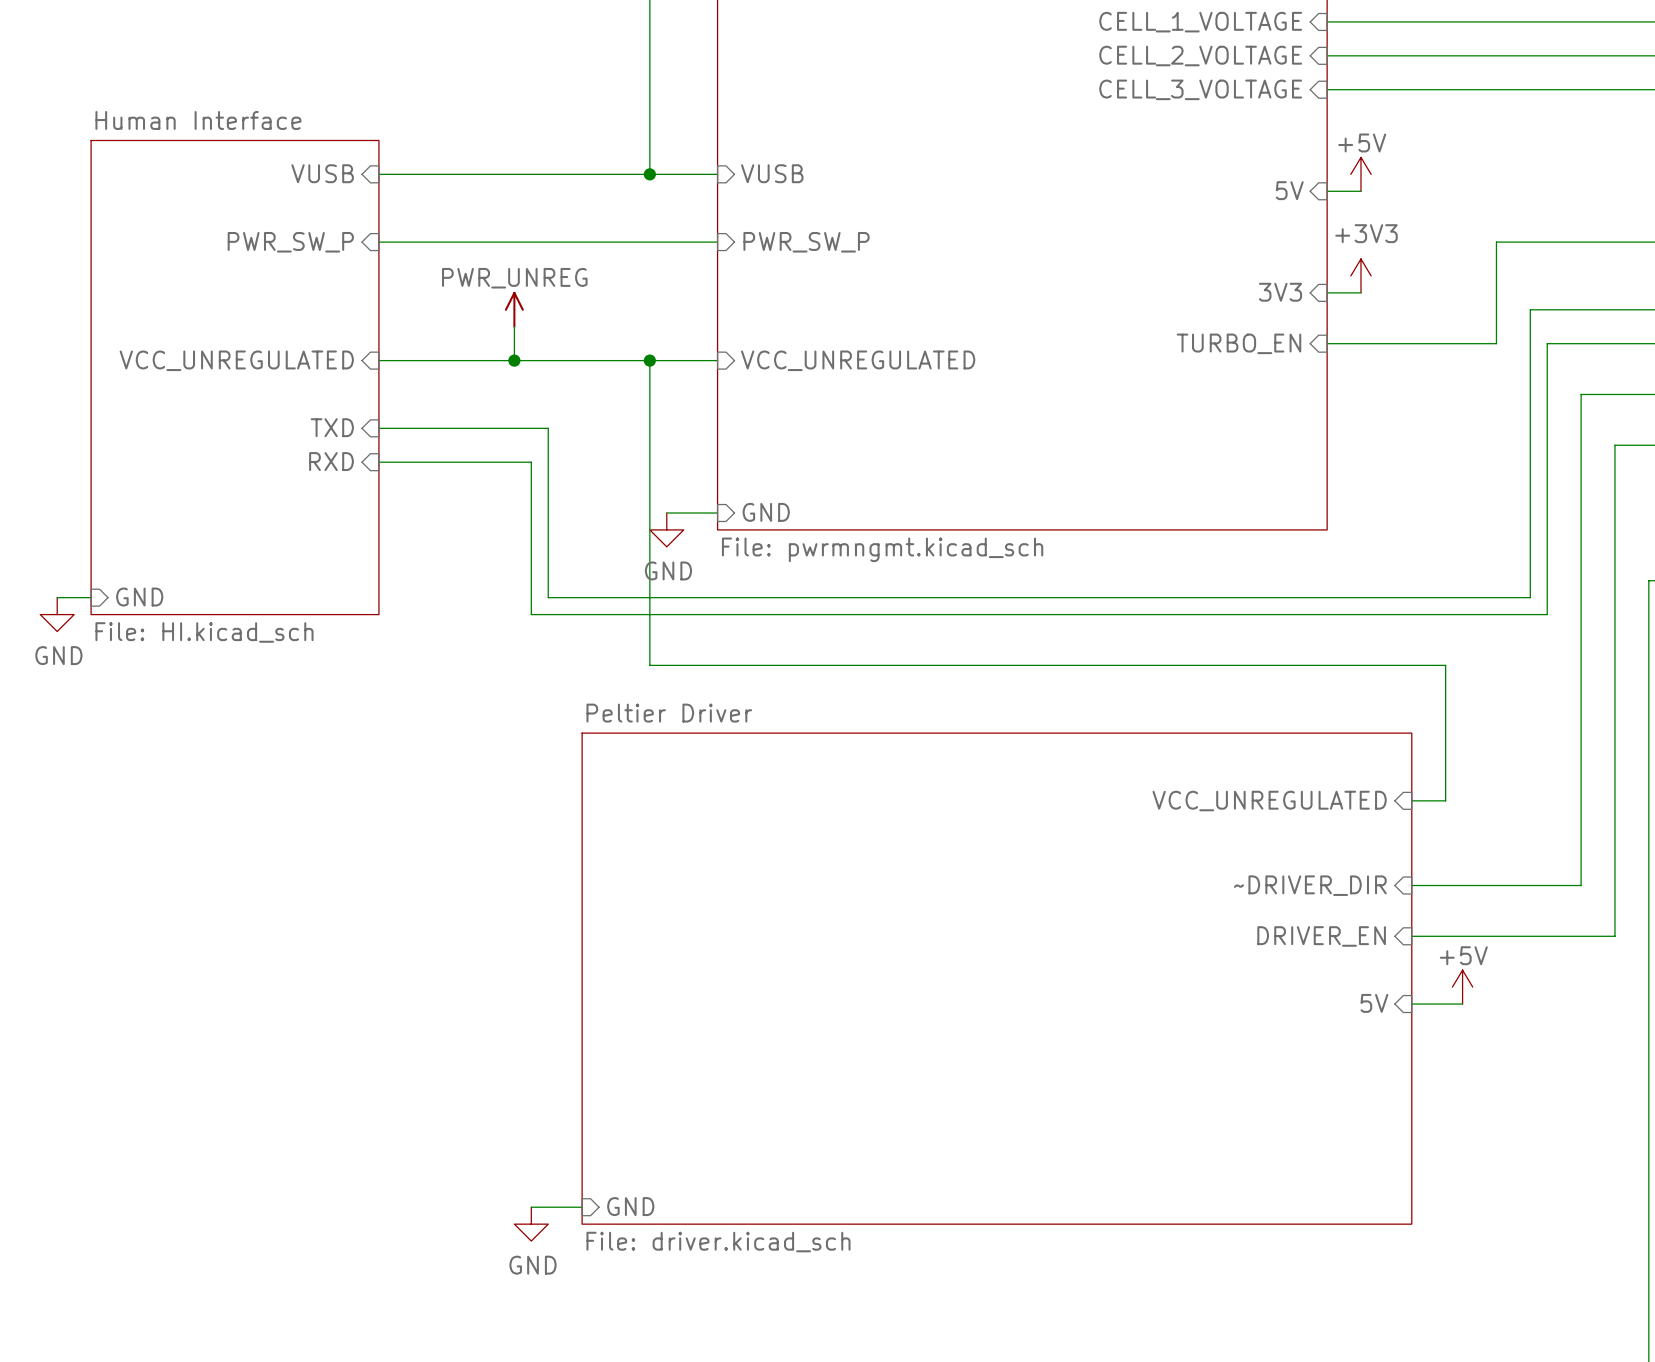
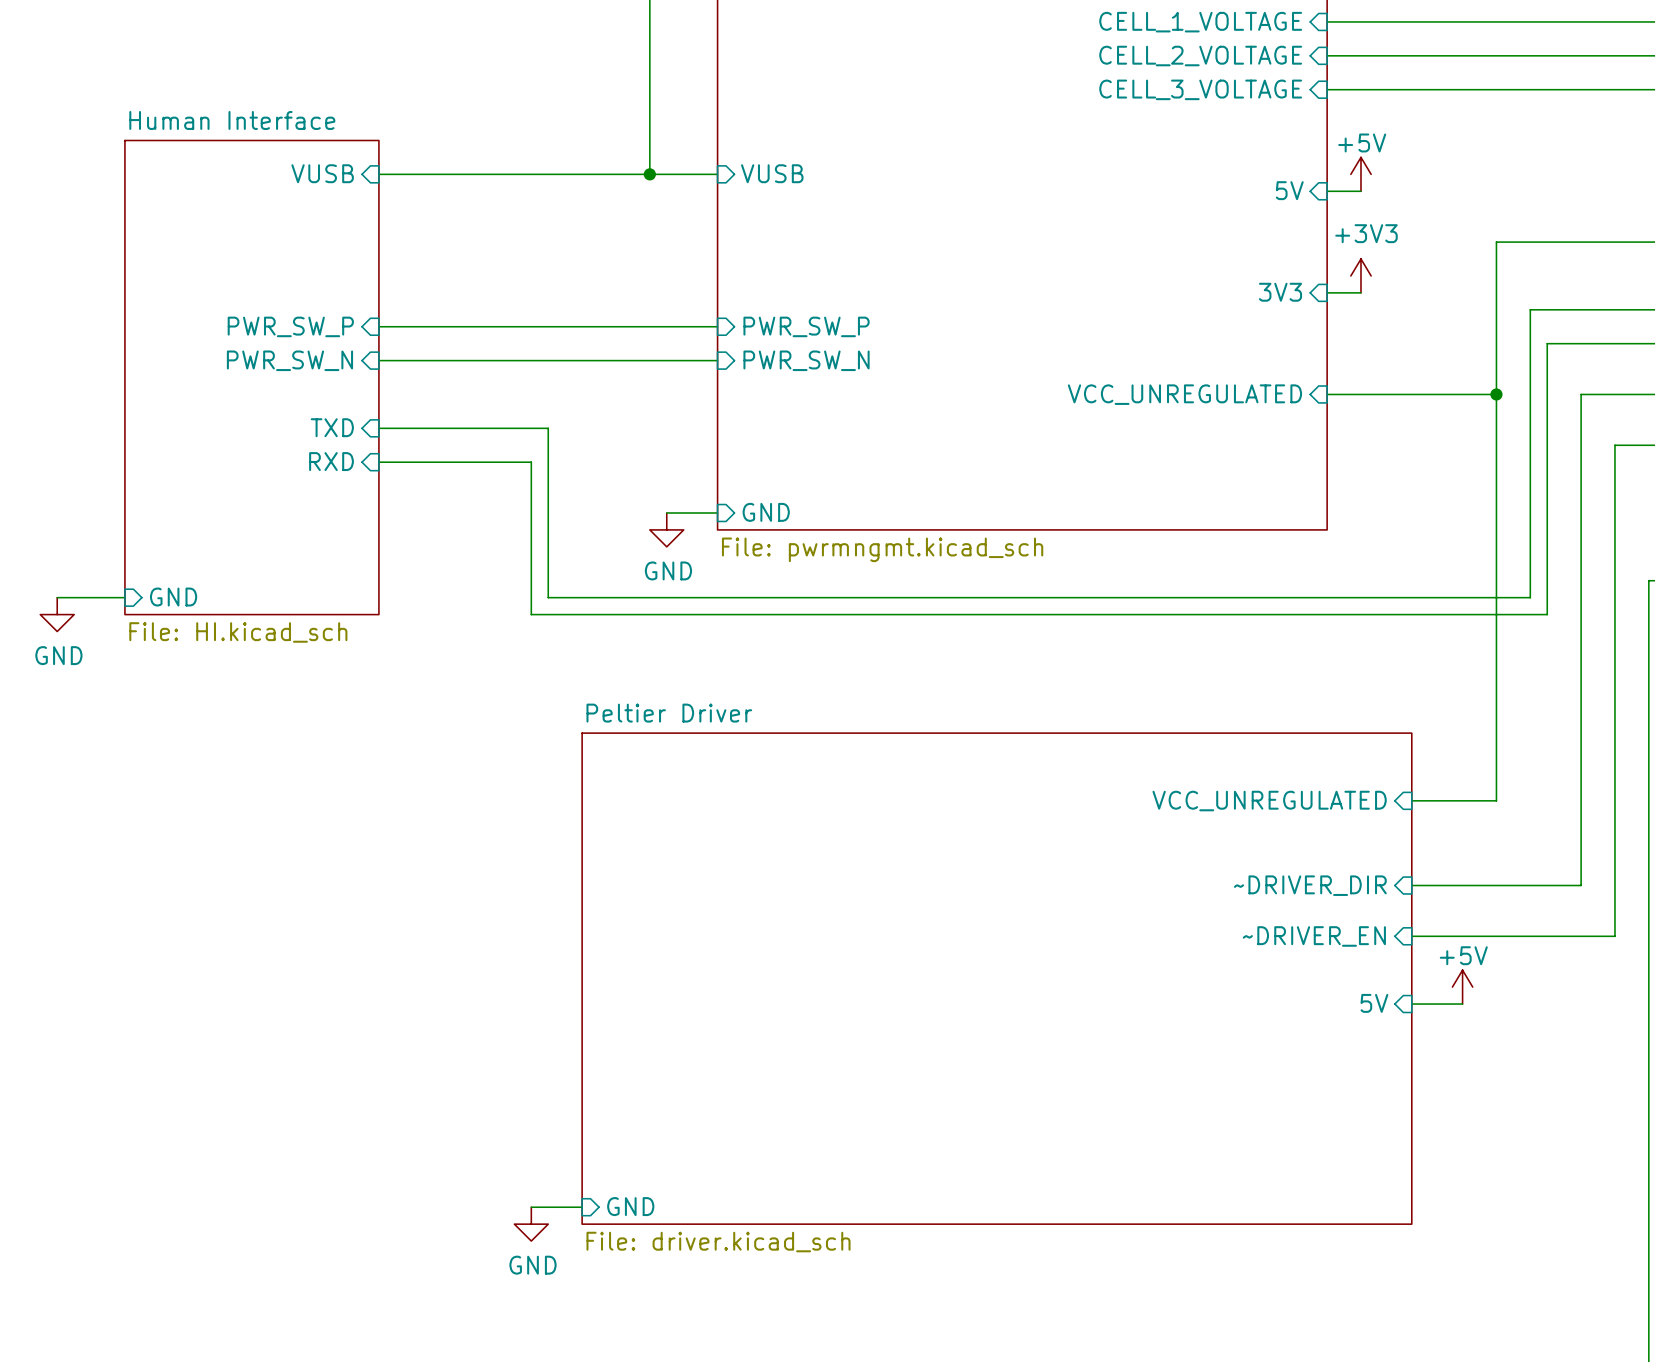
sheet pin position: PWR_SW_P (290, 242) -> PWR_SW_P (290, 326)
wire: (378, 242) (717, 242) -> (378, 326) (717, 326)
sheet pin position: PWR_SW_P (806, 242) -> PWR_SW_P (806, 326)
power symbol: PWR_UNREG (514, 309) -> none
wire: (514, 326) (514, 360) -> none
sheet pin: TURBO_EN (1238, 343) -> none
wire: (1327, 343) (1496, 343) -> (1445, 800) (1496, 800) (1496, 343)
sheet pin: VCC_UNREGULATED (236, 360) -> PWR_SW_N (289, 360)
junction: (514, 360) -> none
wire: (649, 360) (649, 665) (1445, 665) (1445, 800) -> none
junction: (649, 360) -> none
sheet pin: VCC_UNREGULATED (858, 360) -> PWR_SW_N (806, 360)
sheet Human Interface: File: HI.kicad_sch (235, 377) -> none
sheet Human Interface: none -> File: HI.kicad_sch (251, 377)
sheet pin: none -> VCC_UNREGULATED (1184, 394)
wire: none -> (1327, 394) (1496, 394)
junction: none -> (1496, 394)
wire: none -> (91, 597) (124, 597)
sheet pin position: GND (139, 597) -> GND (173, 597)
sheet pin: DRIVER_EN (1321, 936) -> ~DRIVER_EN (1314, 936)

